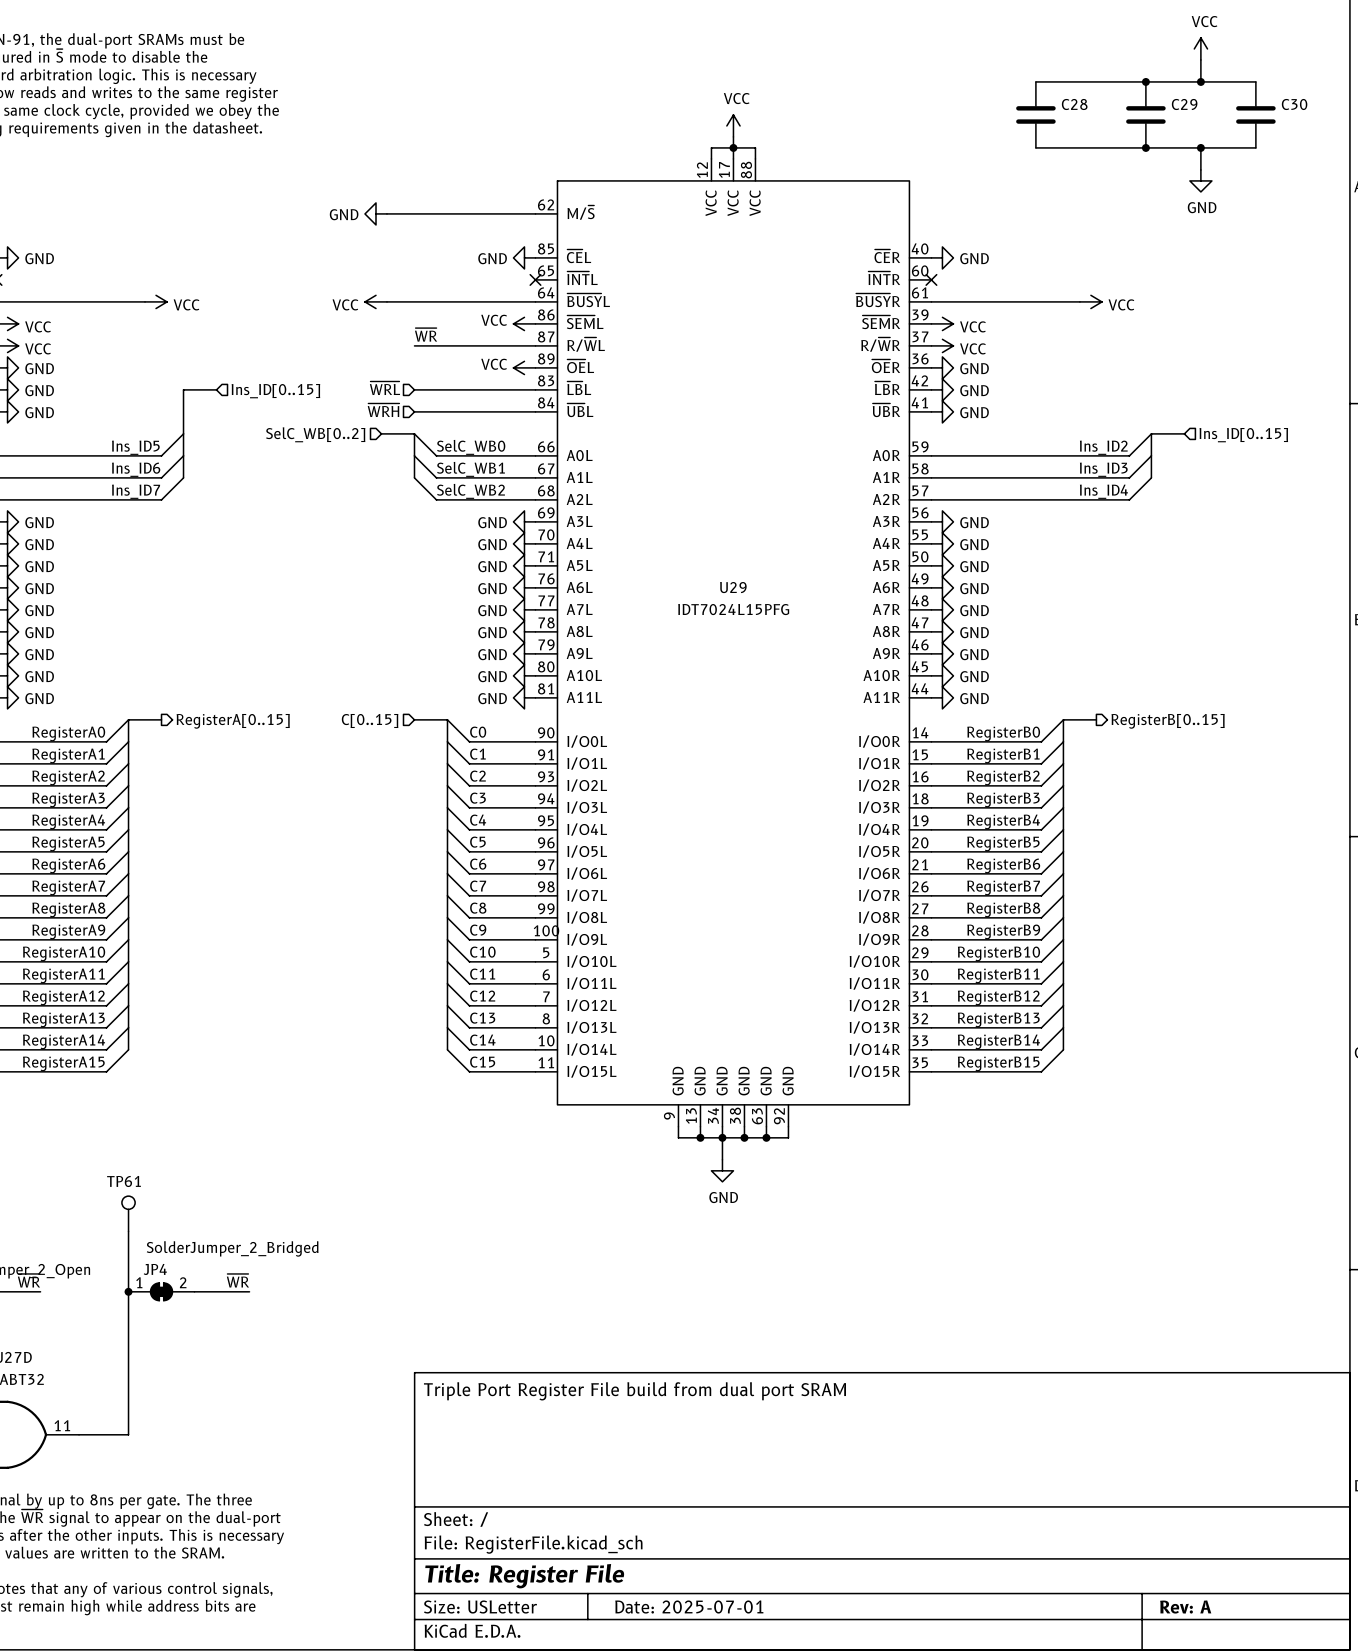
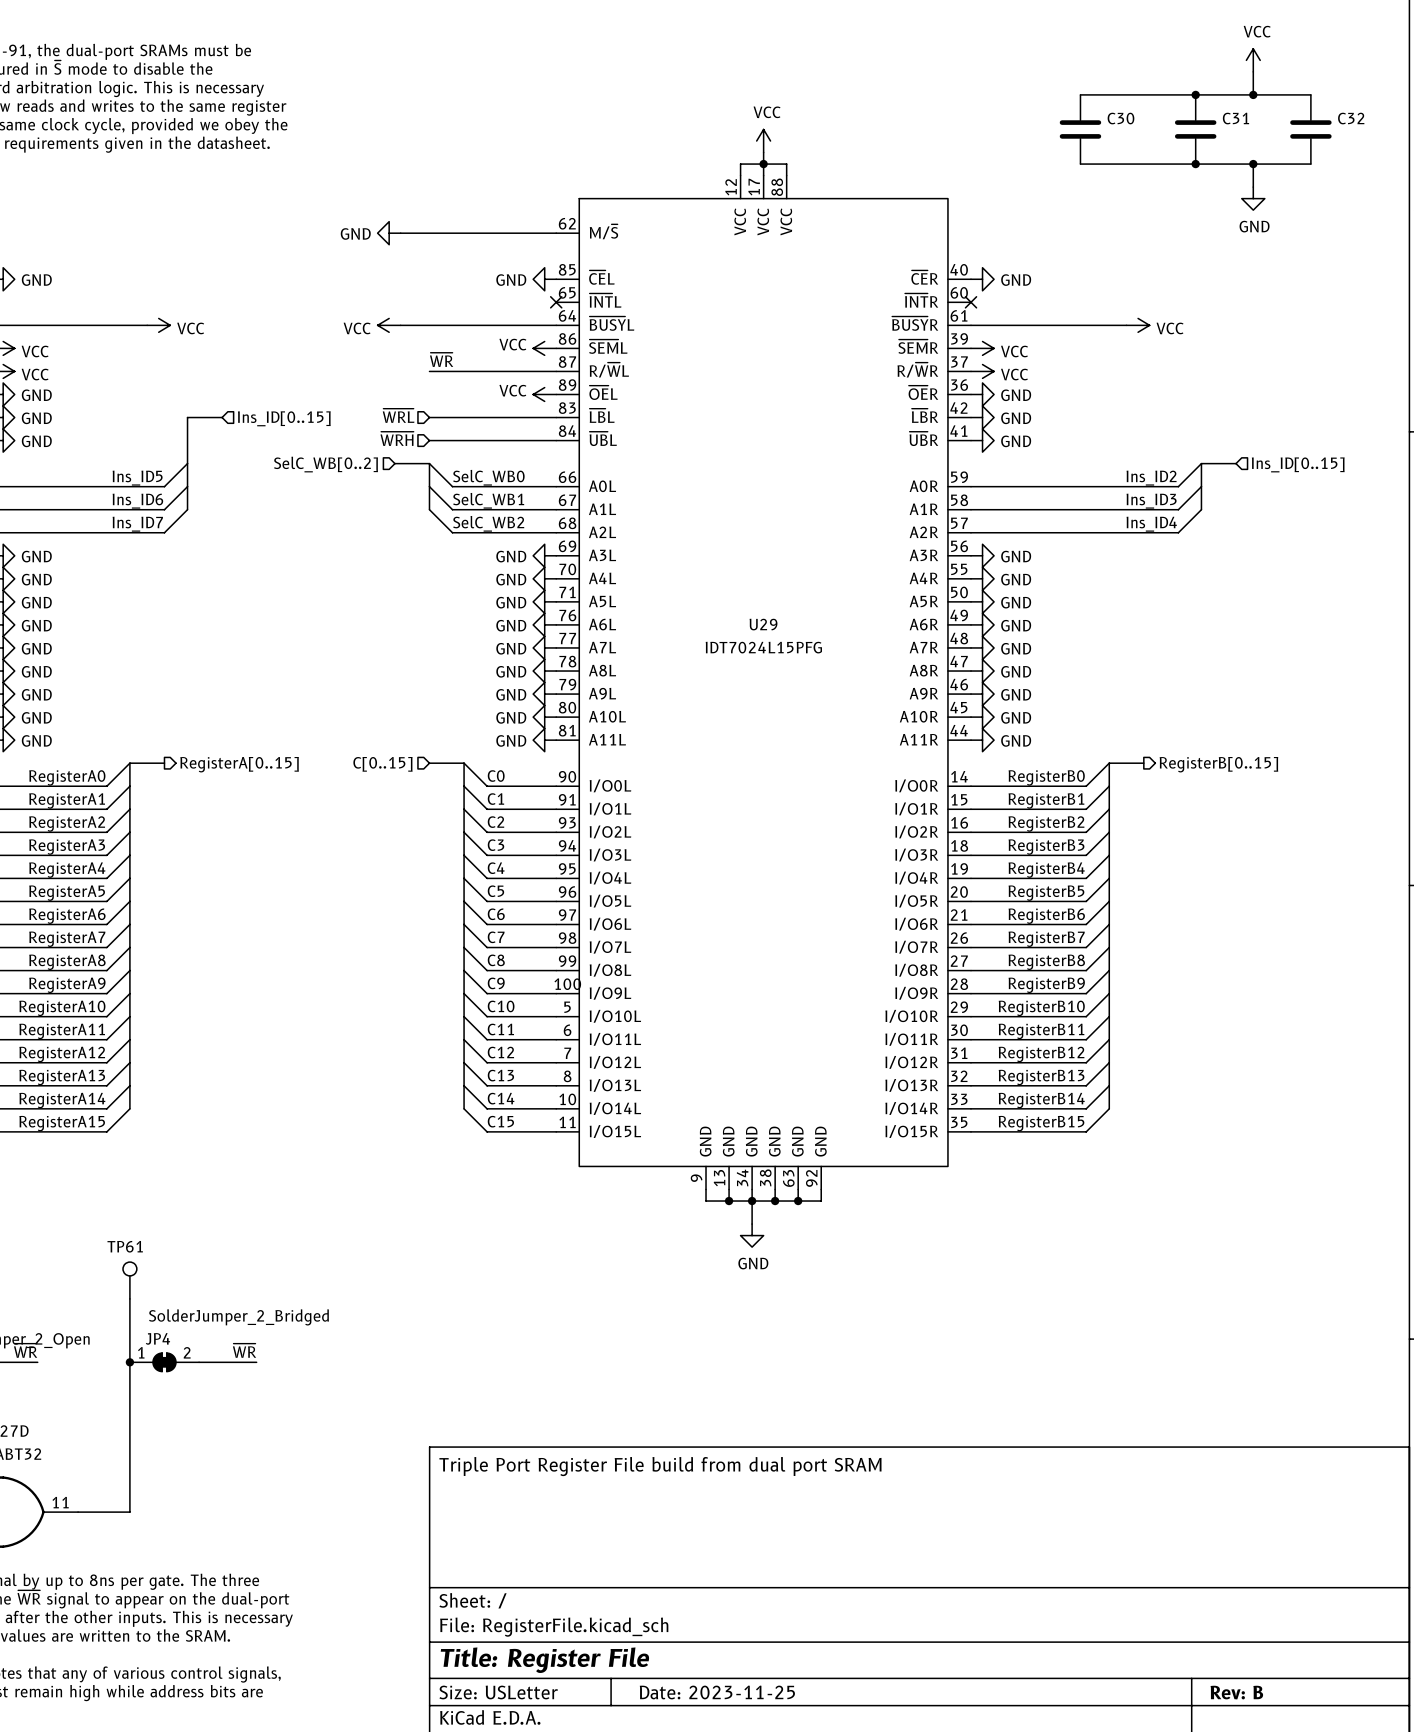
C28 name: C28 (1074, 104) -> C30 (1120, 118)
C29 name: C29 (1184, 104) -> C31 (1235, 118)
C30 name: C30 (1294, 104) -> C32 (1351, 118)
title block: Date: 2025-07-01 (689, 1606) -> Date: 2023-11-25 (717, 1692)
title block: Rev: A (1185, 1607) -> Rev: B (1236, 1692)

